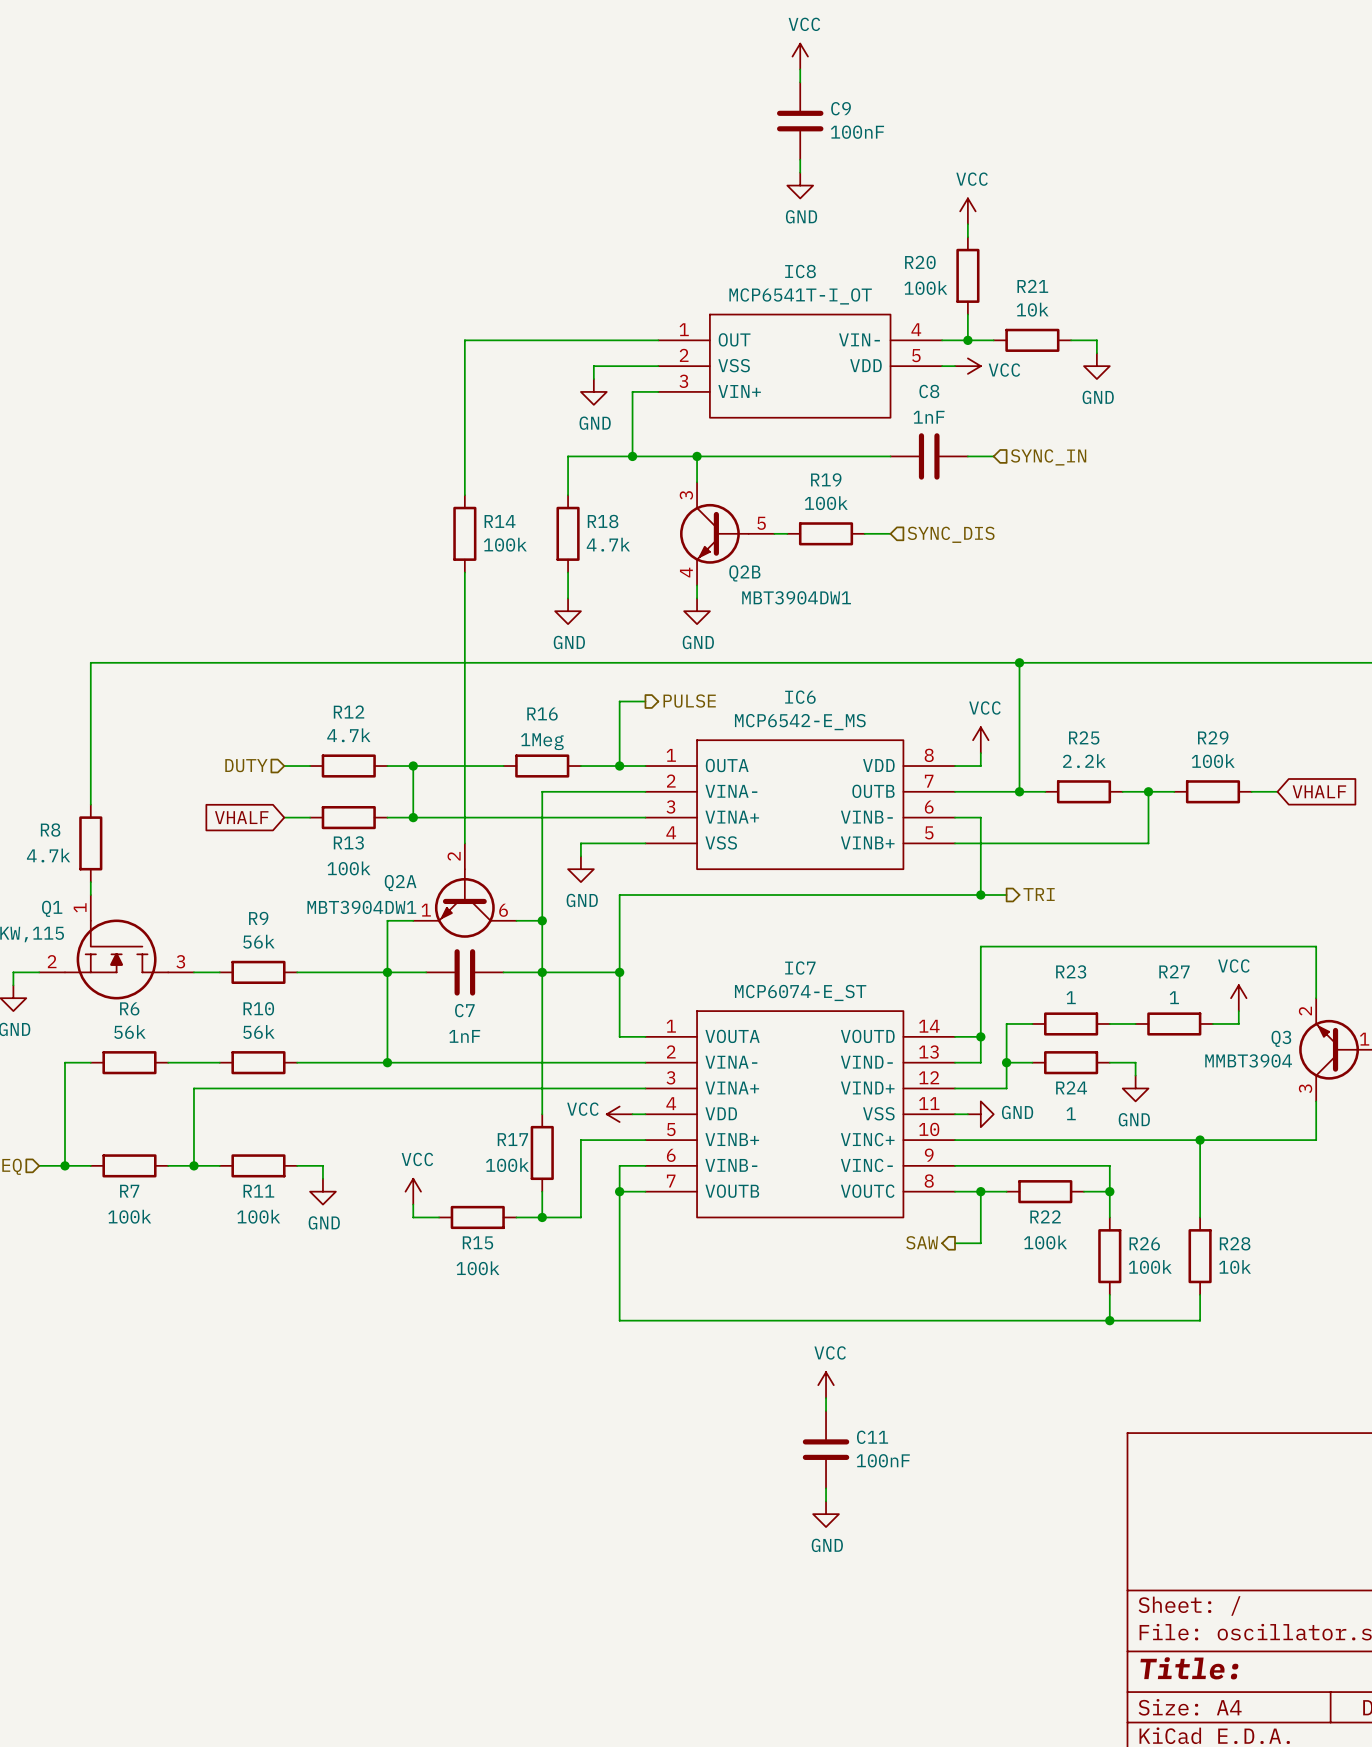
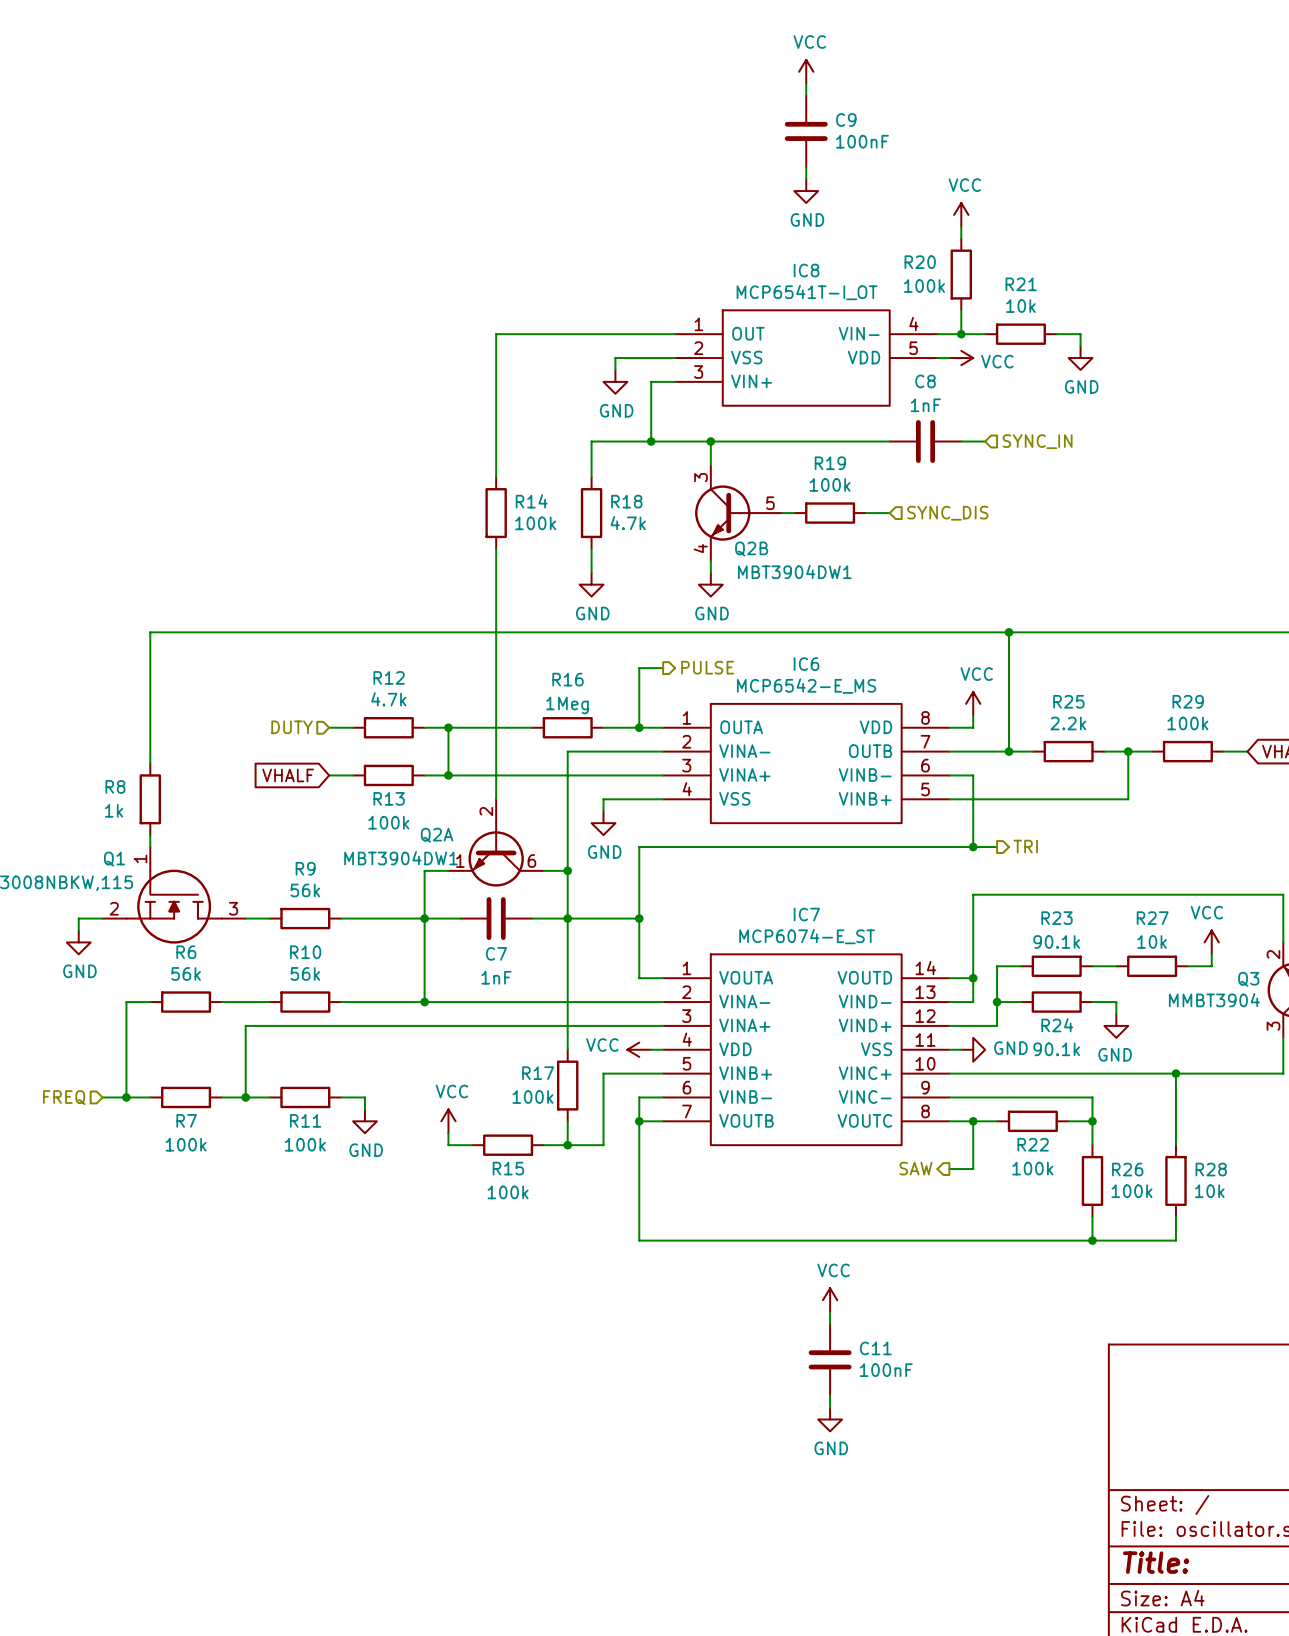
R8 value: 4.7k (48, 855) -> 1k (114, 810)
R23 value: 1 (1071, 997) -> 90.1k (1056, 941)
R27 value: 1 (1174, 997) -> 10k (1152, 941)
R24 value: 1 (1071, 1113) -> 90.1k (1056, 1049)

